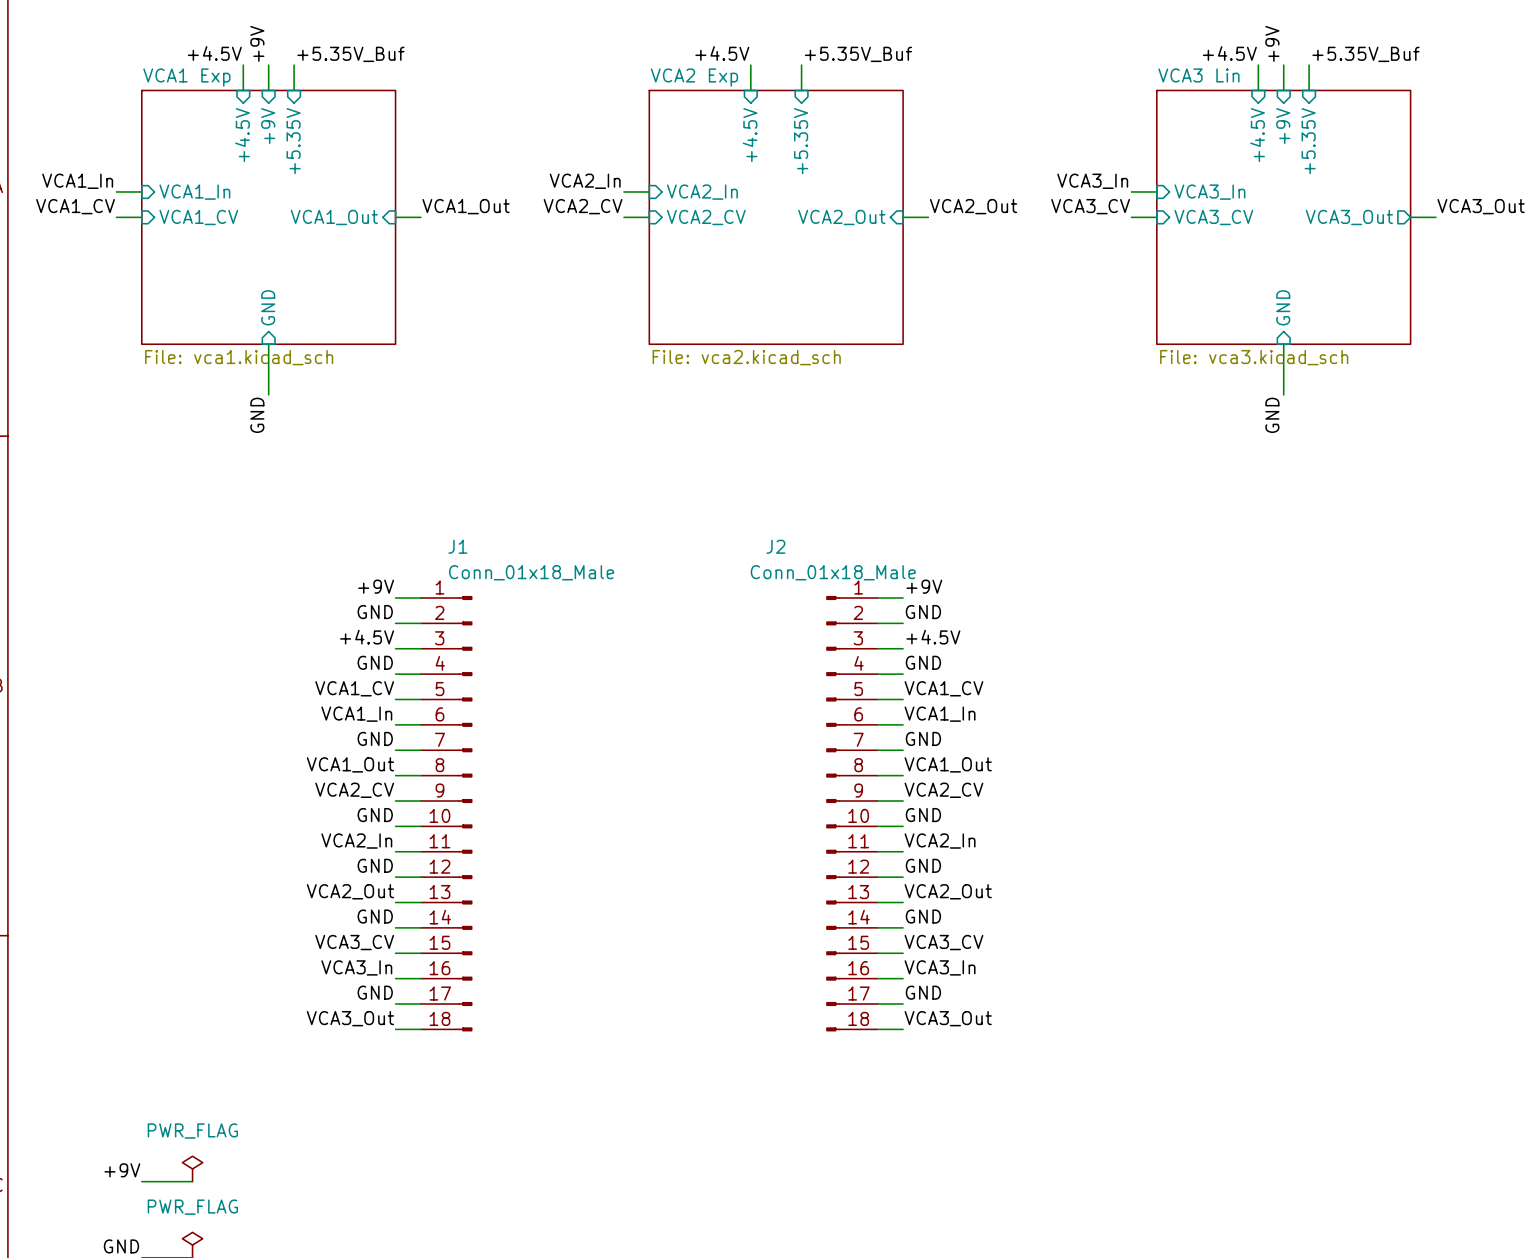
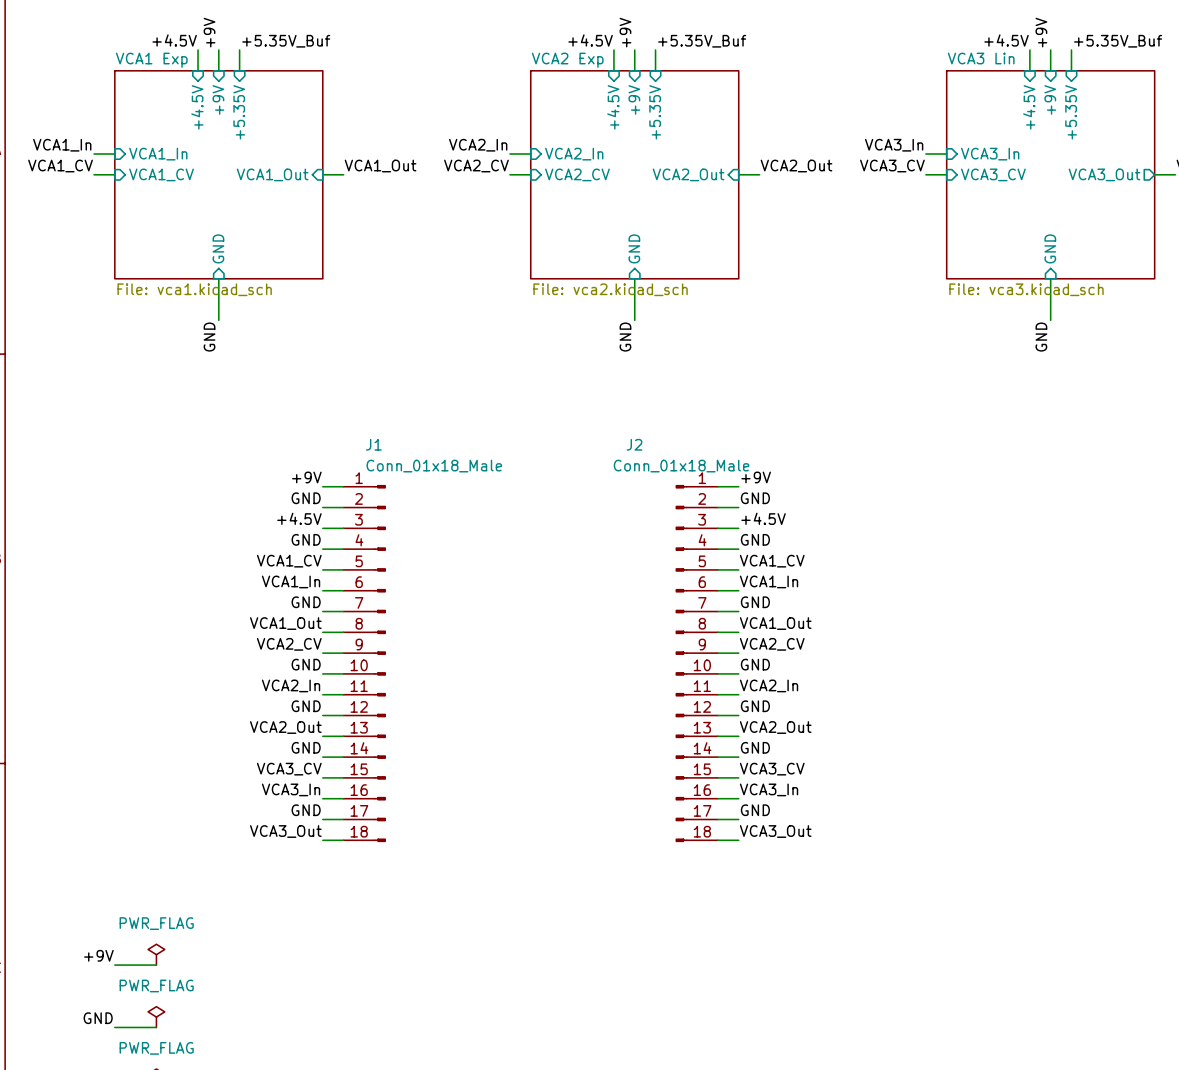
label: none -> +9V (625, 32)
wire: none -> (634, 50) (634, 70)
sheet pin: none -> +9V (634, 99)
sheet pin: none -> GND (634, 248)
wire: none -> (634, 278) (634, 320)
label: none -> GND (625, 337)

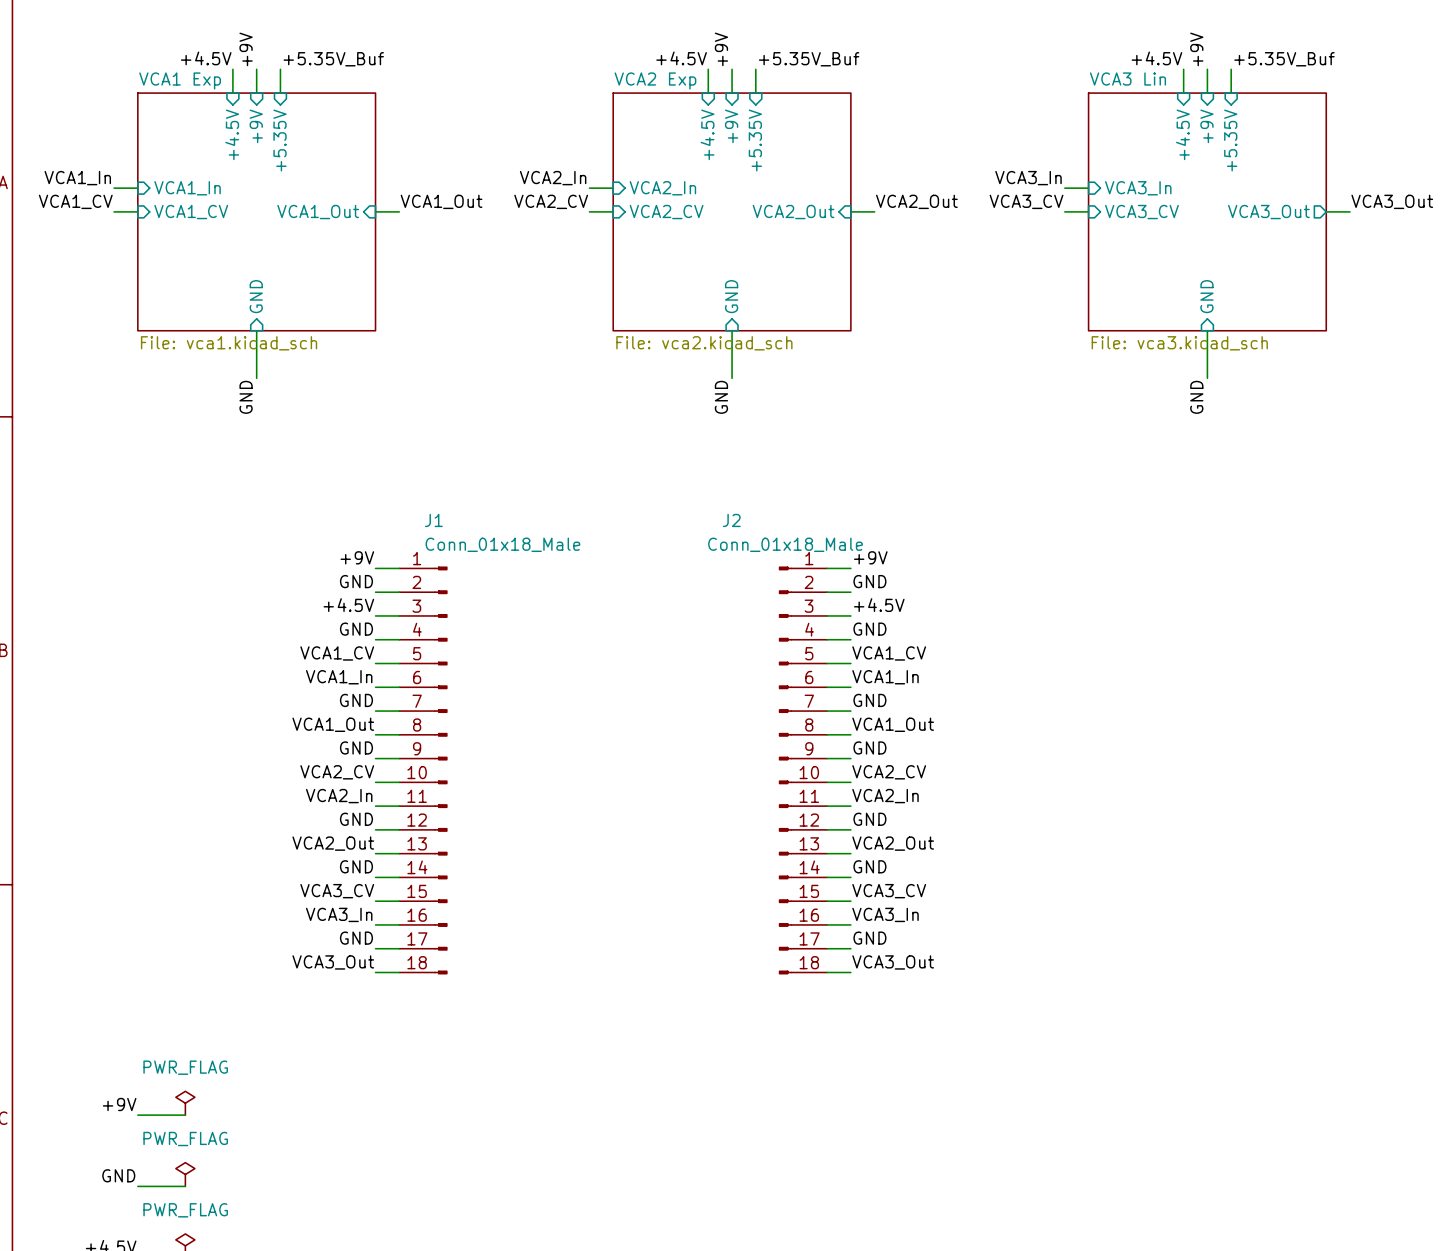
label: VCA2_CV (289, 644) -> GND (356, 747)
label: VCA2_CV (772, 644) -> GND (869, 747)
label: GND (306, 664) -> VCA2_CV (337, 772)
label: GND (755, 664) -> VCA2_CV (889, 772)

